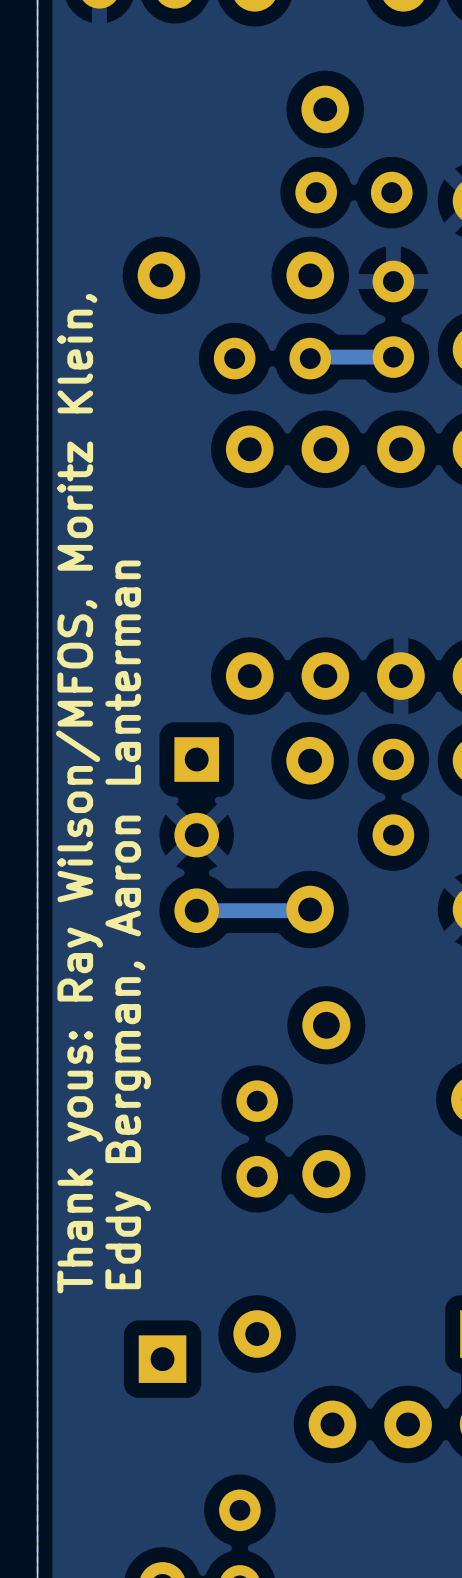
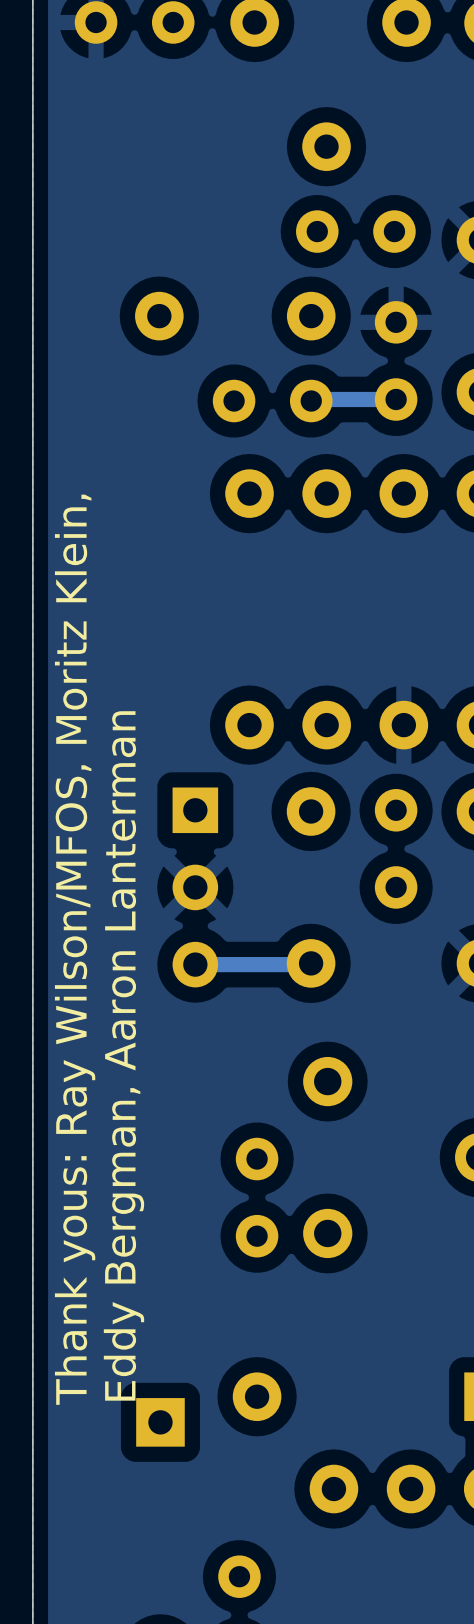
text position: Thank yous: Ray Wilson/MFOS, Moritz Klein, (79, 793) -> Thank yous: Ray Wilson/MFOS, Moritz Klein, (75, 949)
text position: Eddy Bergman, Aaron Lanterman (128, 924) -> Eddy Bergman, Aaron Lanterman (123, 1055)

